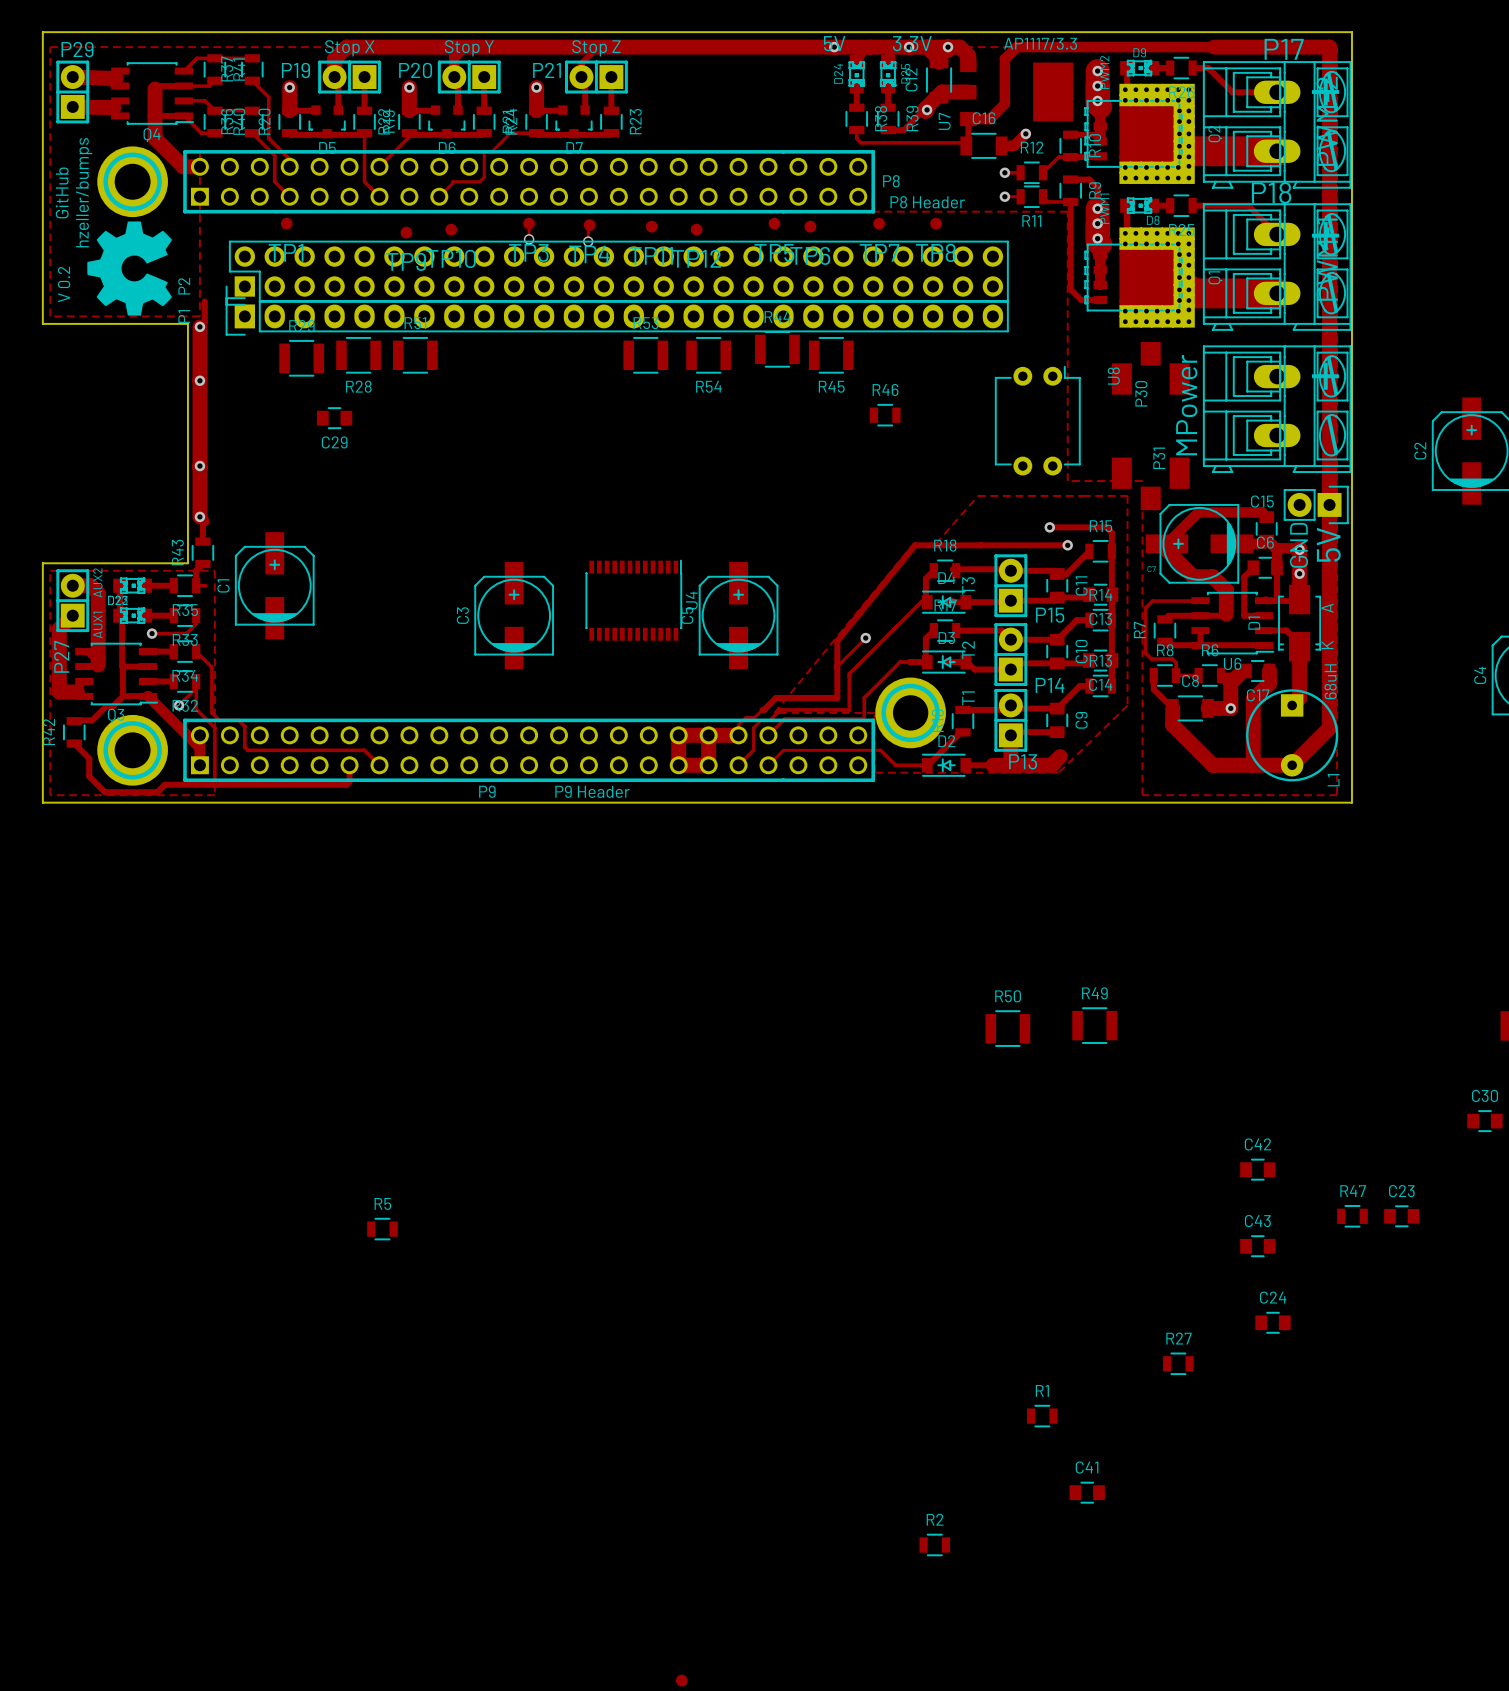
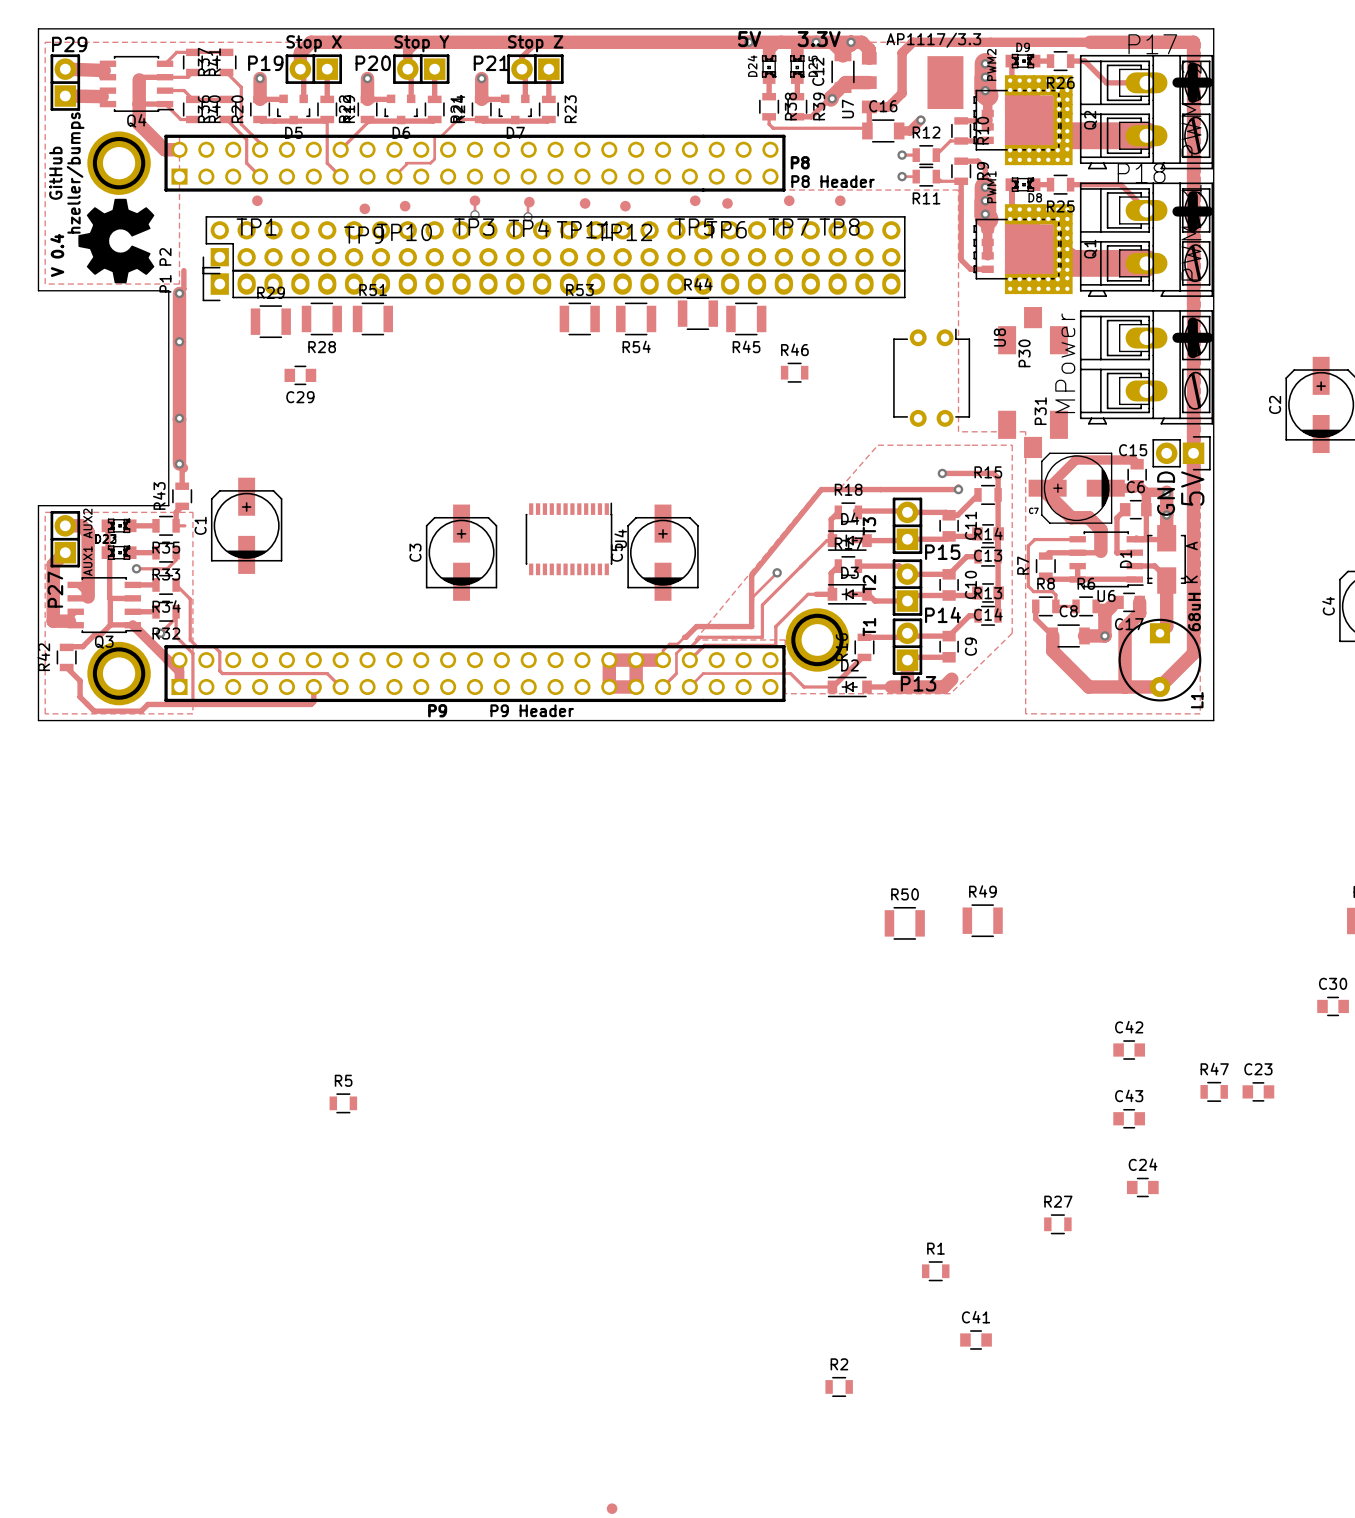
text: V 0.2 (64, 284) -> V 0.4 (57, 255)

